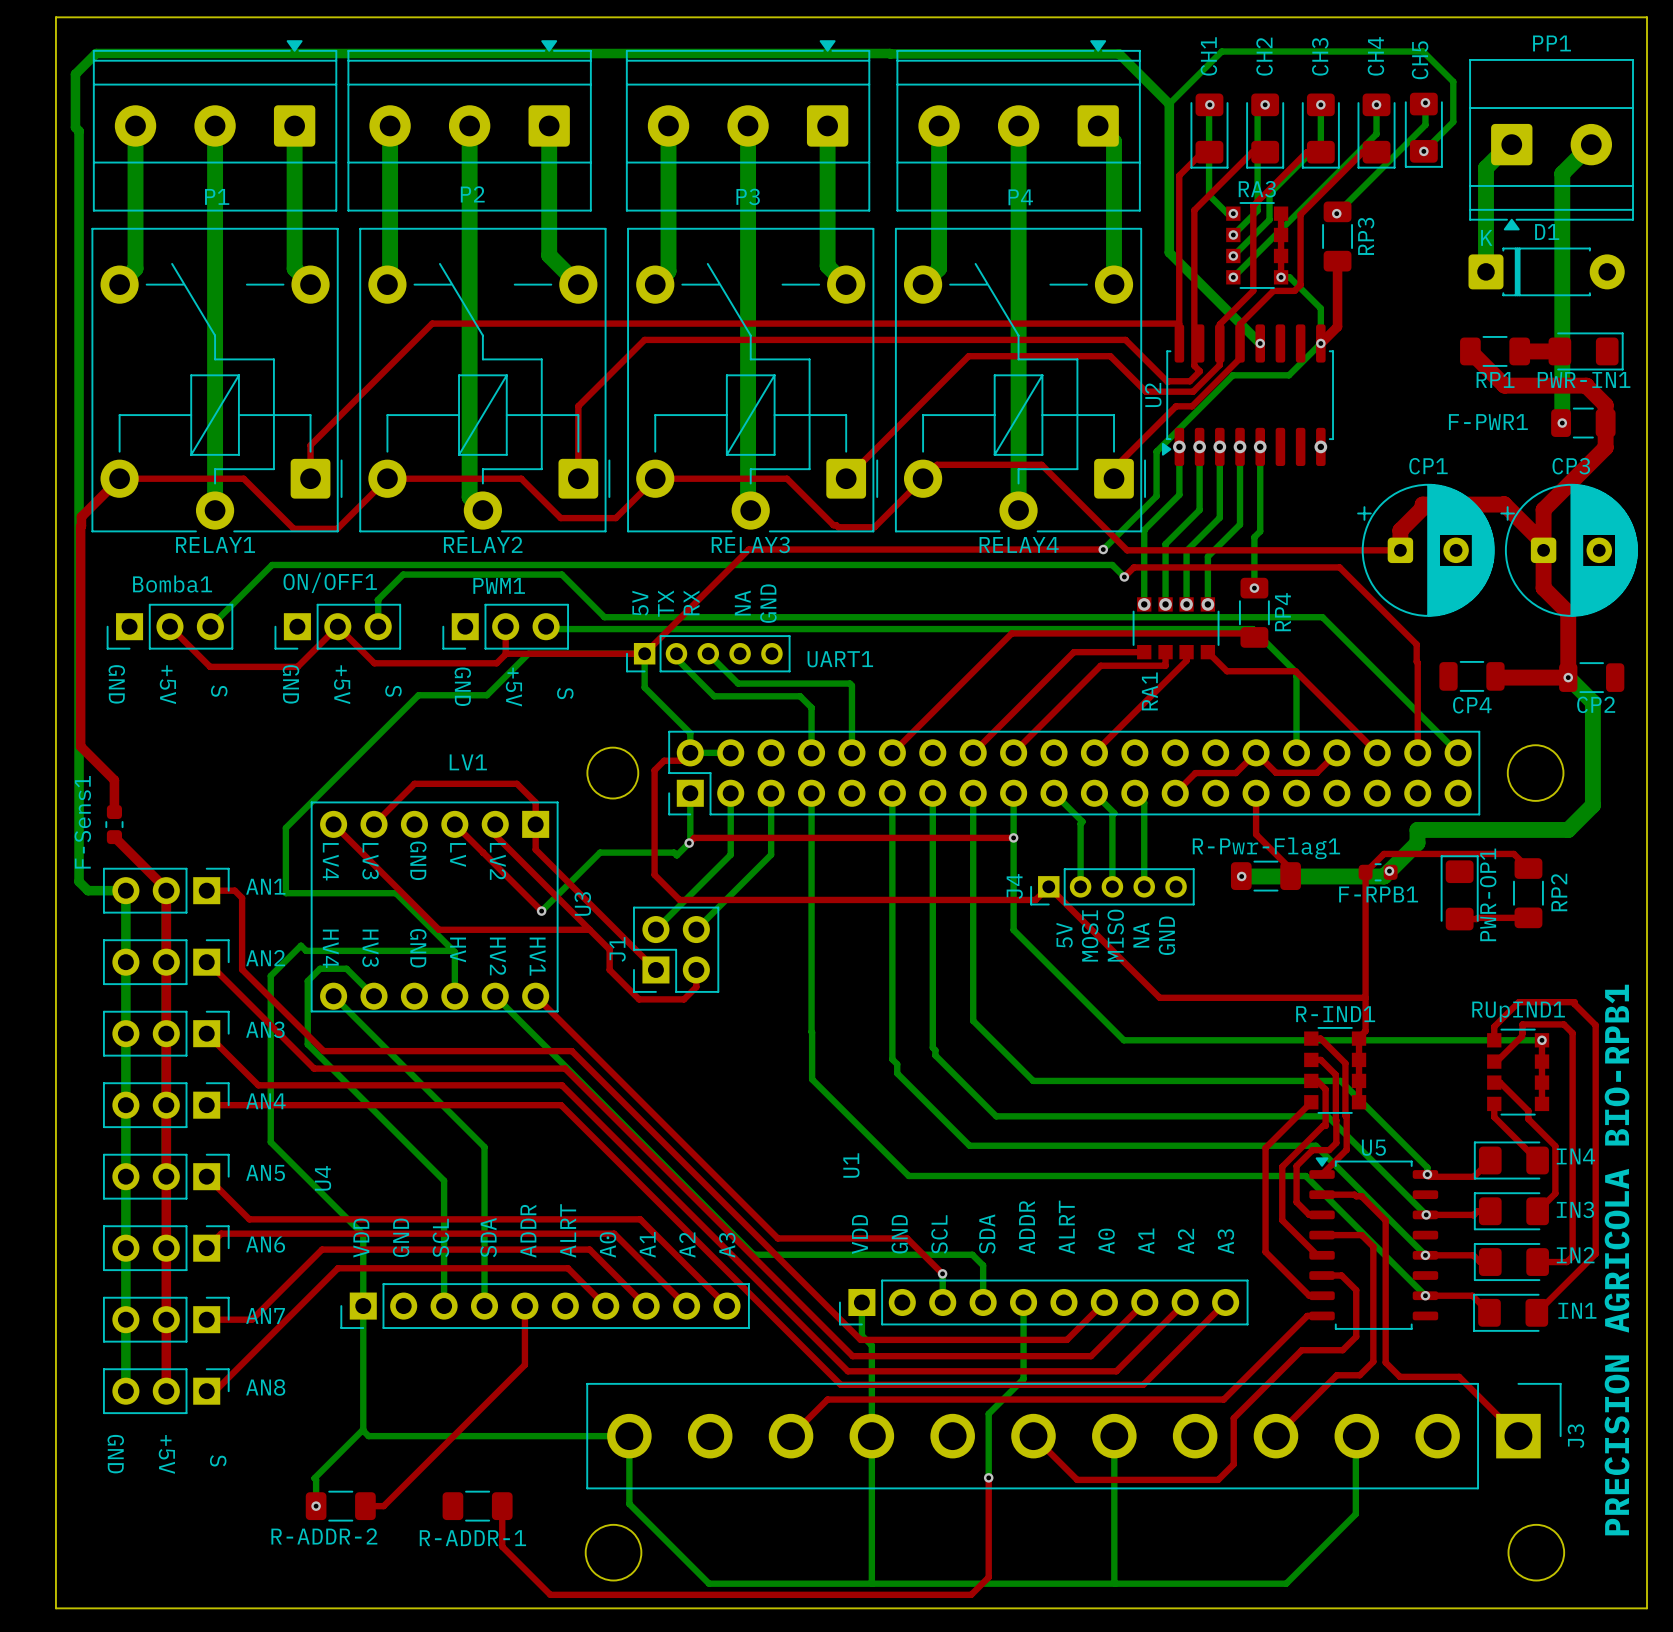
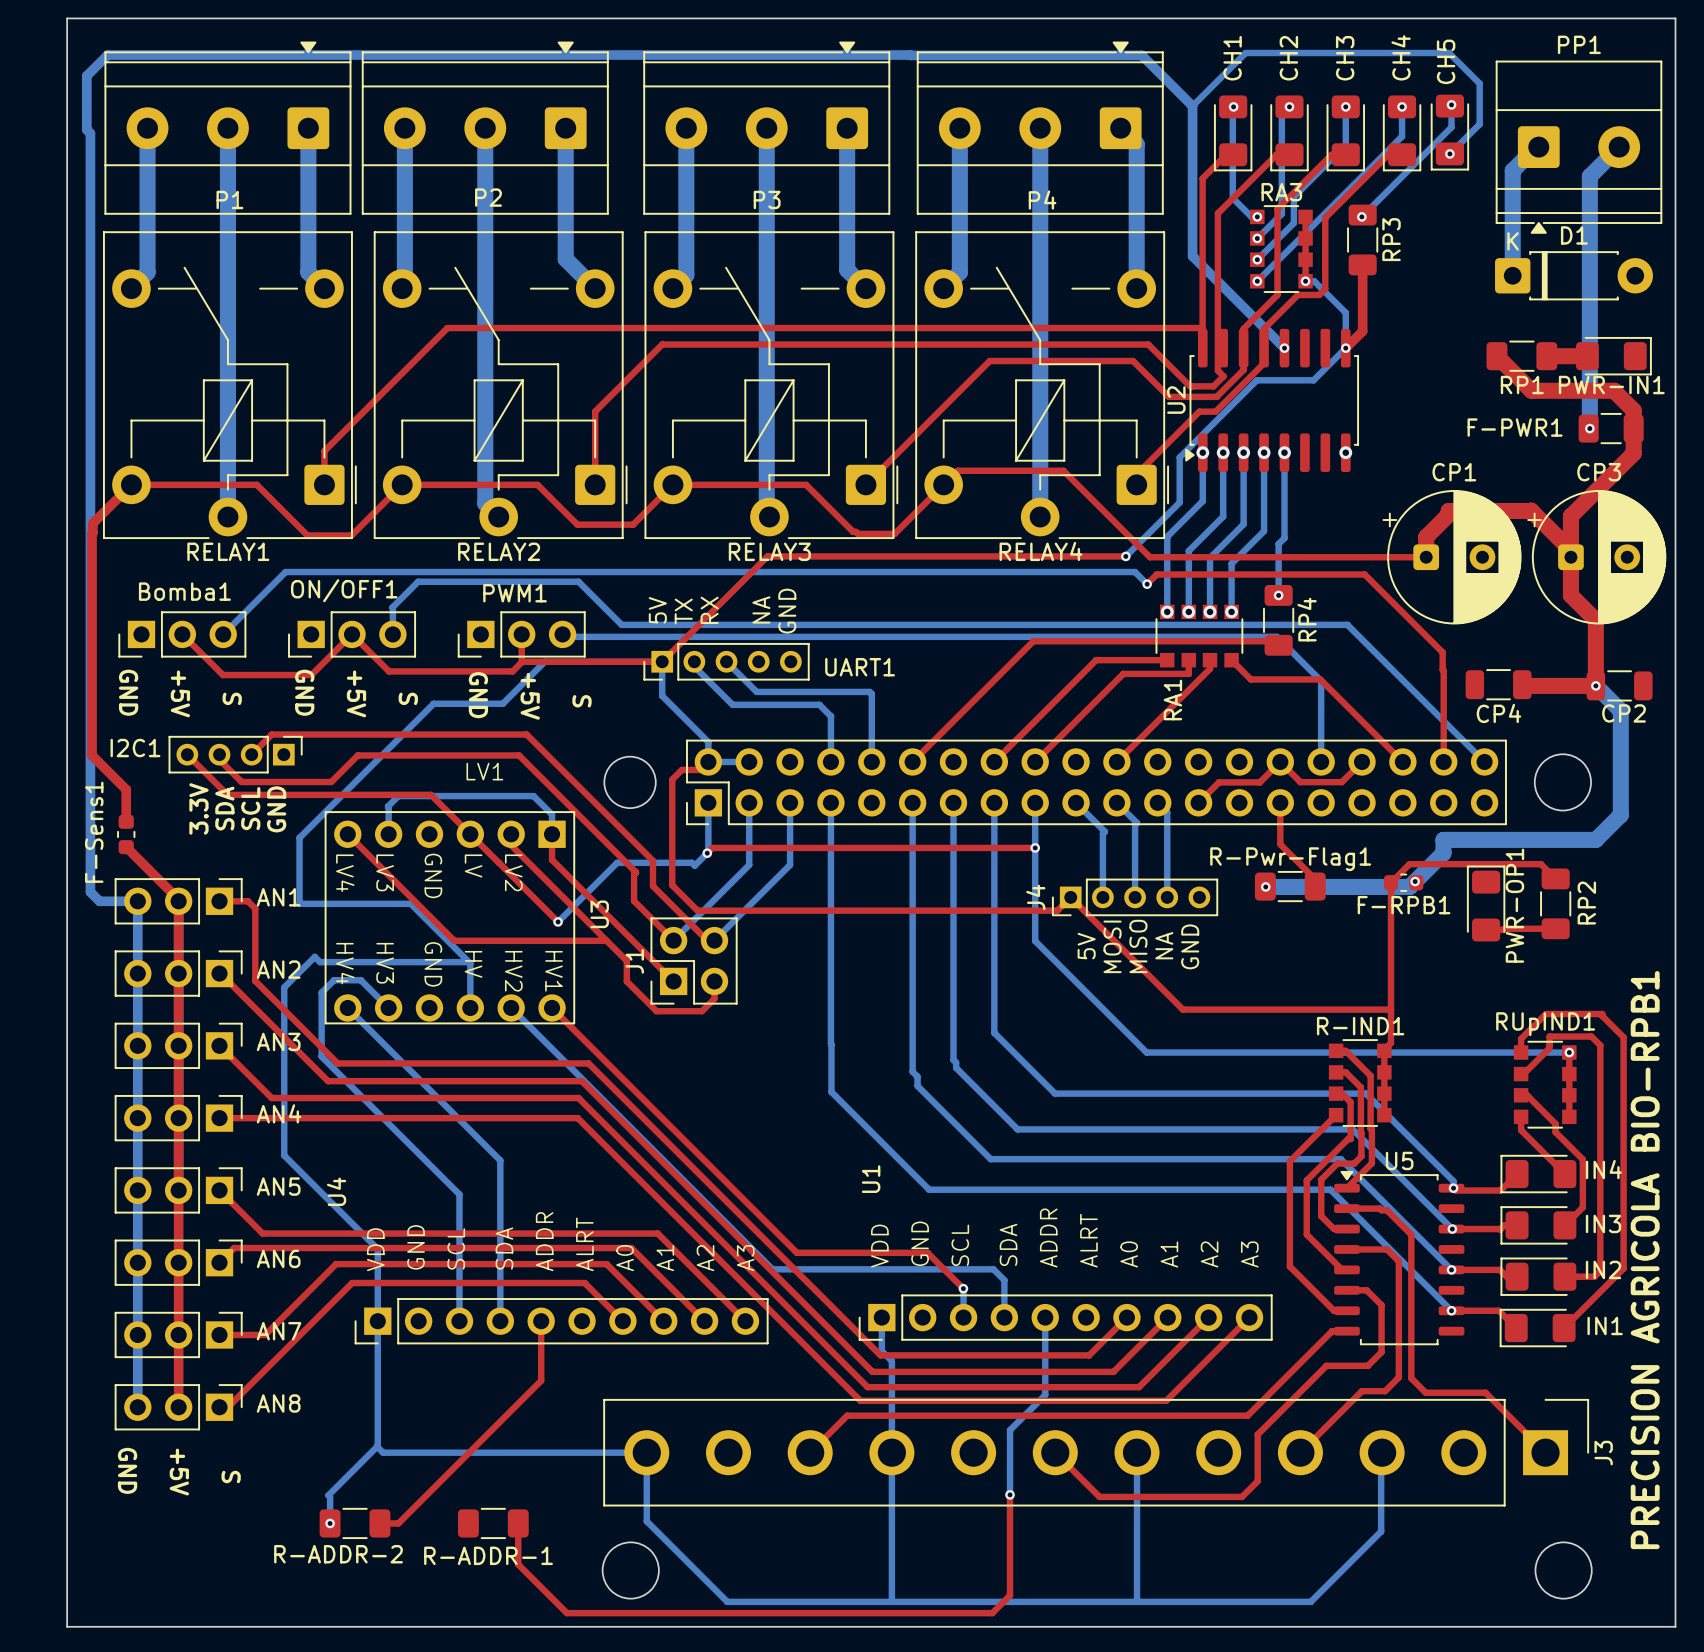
top track: none -> (187, 754) (227, 794) (430, 794) (470, 834)
top track: none -> (219, 754) (219, 759) (241, 782) (331, 782) (357, 755) (519, 755) (636, 872) (634, 874) (634, 901) (673, 940)
I2C1: none -> (235, 754)
top track: none -> (251, 754) (271, 734) (526, 734) (652, 860) (652, 886) (707, 940) (714, 940)
text: none -> 3.3V (198, 808)
text: none -> SDA (224, 808)
text: none -> SCL (250, 808)
text: none -> GND (276, 809)
top track: (374, 824) (414, 783) (516, 783) (535, 802) (535, 824) -> none
bottom track: none -> (388, 834) (387, 806) (398, 796) (533, 796) (552, 814) (552, 834)

